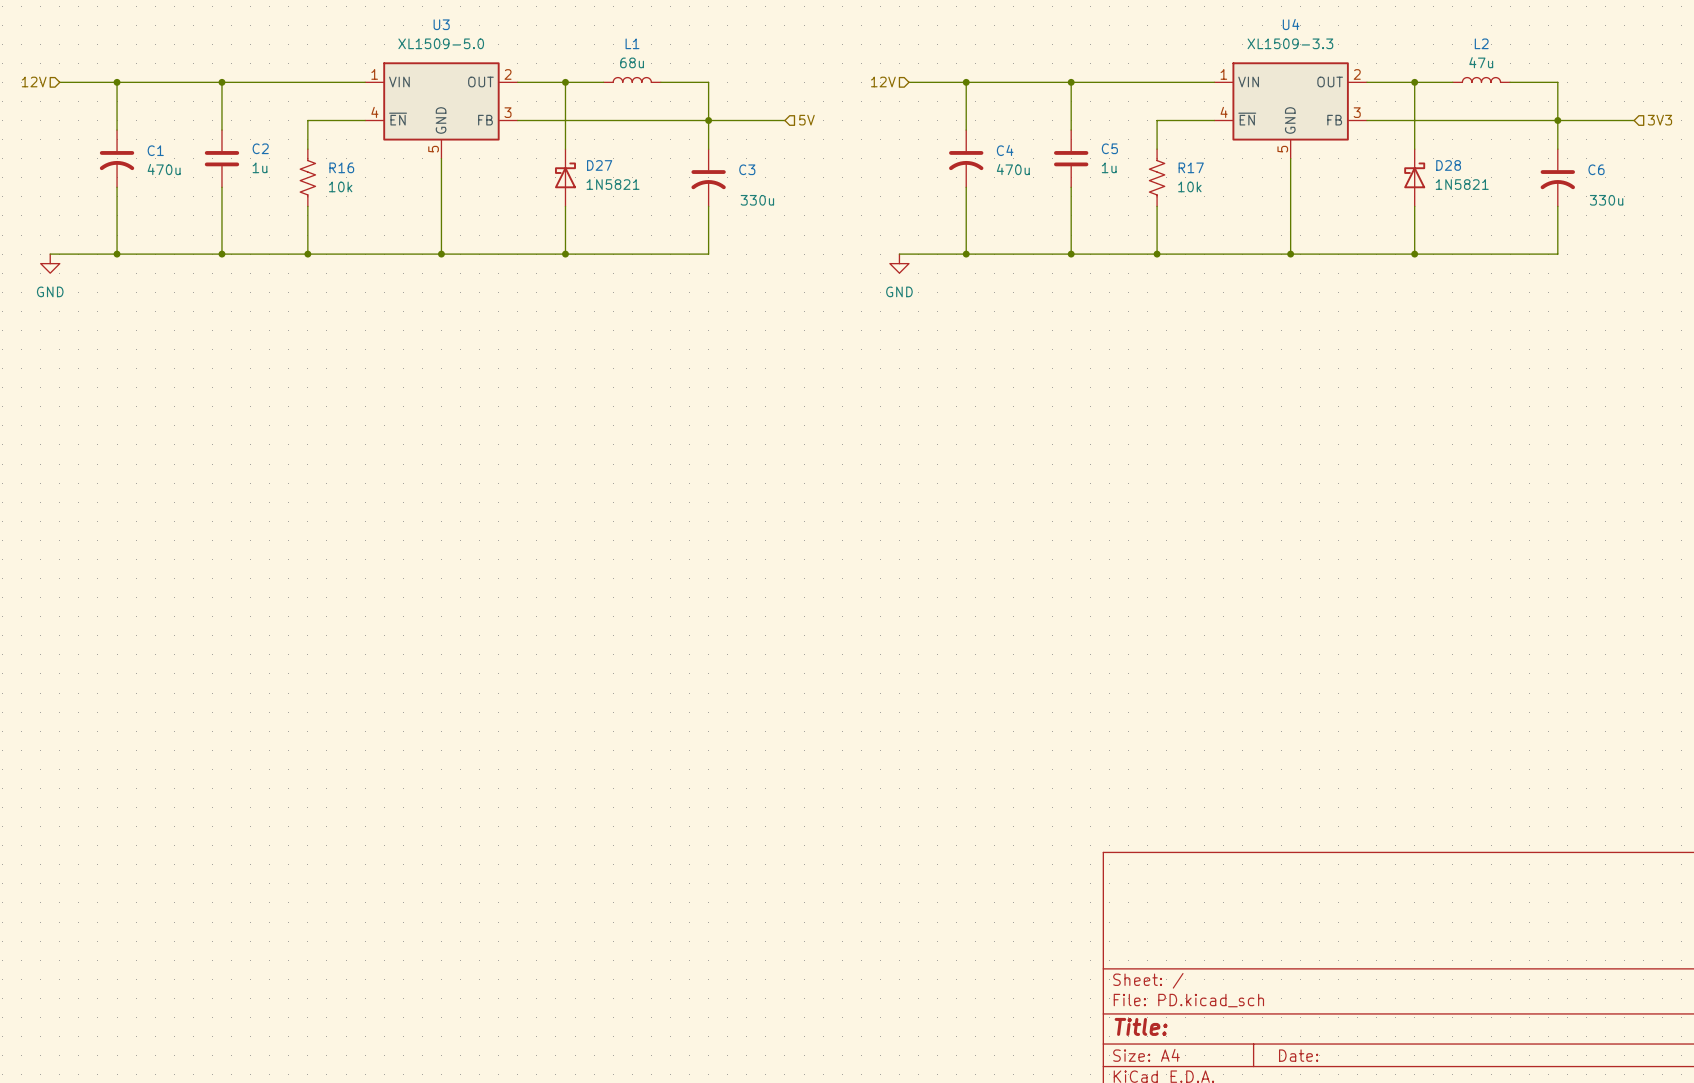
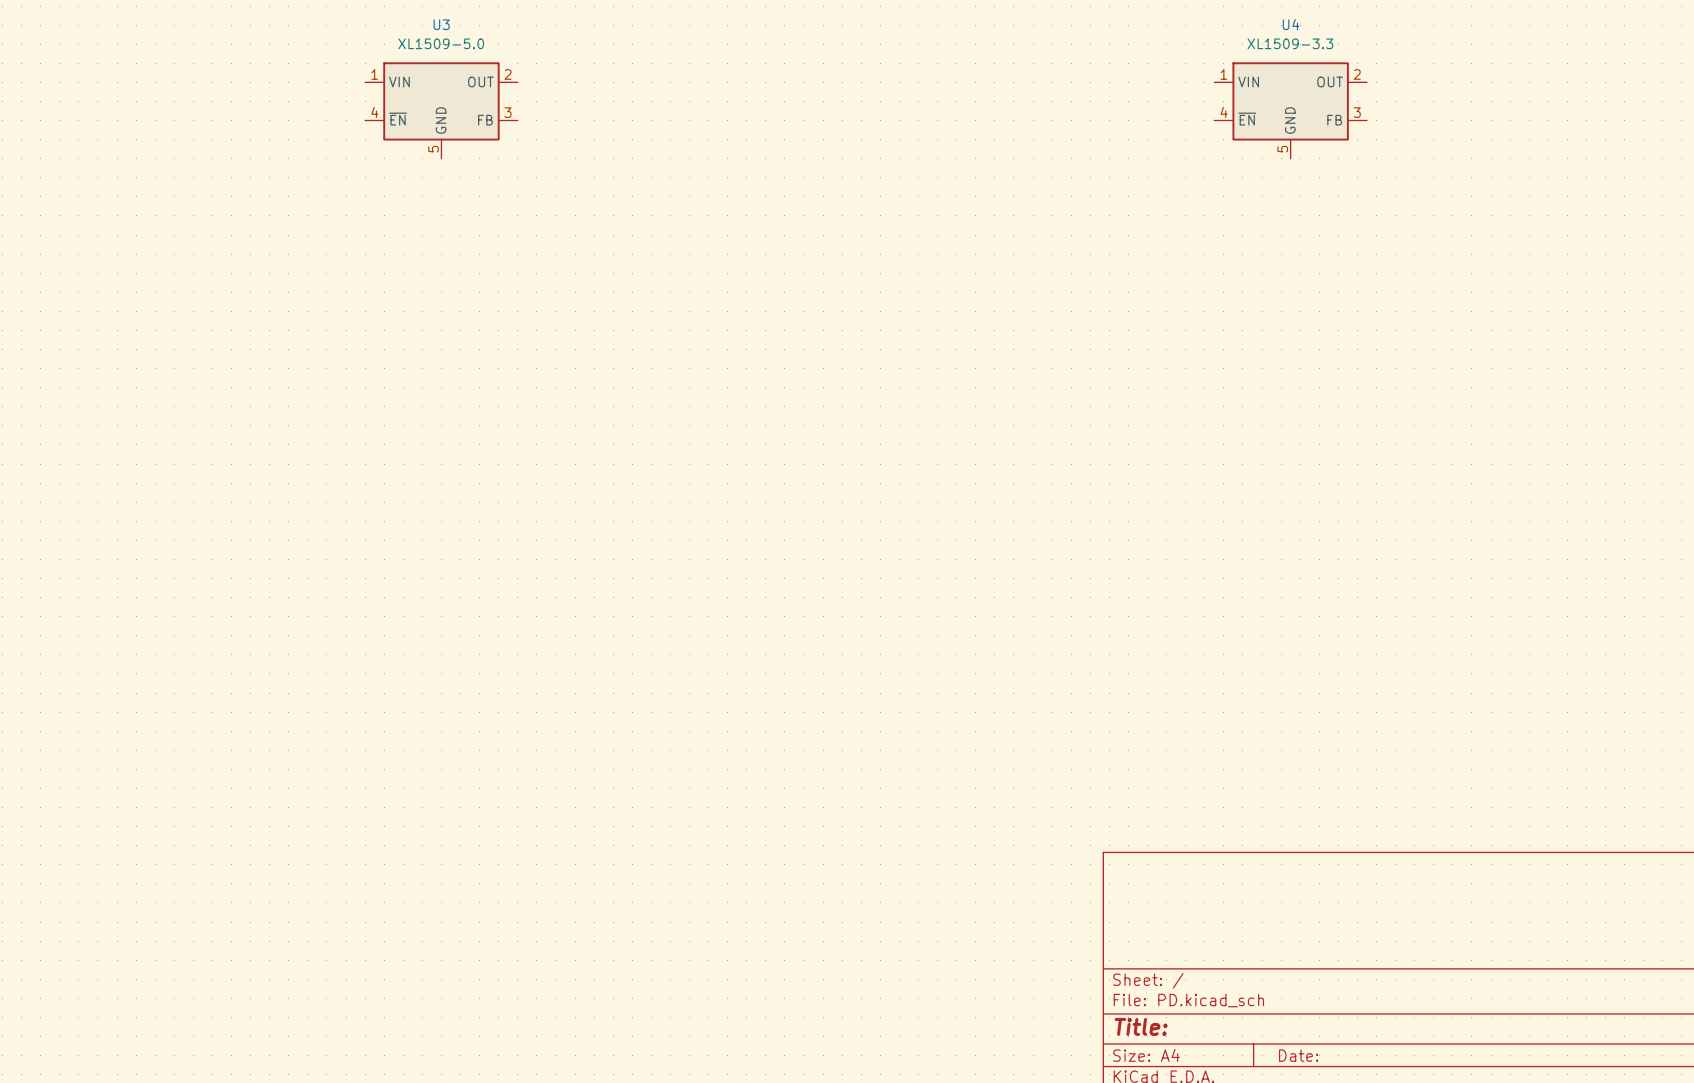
L1: 68u (632, 79) -> none
L2: 47u (1481, 79) -> none
hierarchical label: 12V (34, 81) -> none
hierarchical label: 12V (883, 81) -> none
wire: (59, 82) (365, 82) -> none
wire: (117, 82) (117, 130) -> none
junction: (117, 82) -> none
wire: (221, 82) (221, 130) -> none
junction: (221, 82) -> none
wire: (517, 82) (603, 82) -> none
wire: (565, 82) (565, 149) -> none
junction: (565, 82) -> none
wire: (660, 82) (708, 82) (708, 149) -> none
wire: (908, 82) (1214, 82) -> none
wire: (966, 82) (966, 130) -> none
junction: (966, 82) -> none
wire: (1071, 82) (1071, 130) -> none
junction: (1071, 82) -> none
wire: (1366, 82) (1452, 82) -> none
wire: (1414, 82) (1414, 149) -> none
junction: (1414, 82) -> none
wire: (1510, 82) (1557, 82) (1557, 149) -> none
wire: (365, 120) (307, 120) (307, 149) -> none
wire: (517, 120) (784, 120) -> none
junction: (708, 120) -> none
hierarchical label: 5V (806, 120) -> none
wire: (1214, 120) (1157, 120) (1157, 149) -> none
wire: (1366, 120) (1634, 120) -> none
junction: (1557, 120) -> none
hierarchical label: 3V3 (1659, 120) -> none
C1: 470u (117, 158) -> none
C2: 1u (221, 158) -> none
wire: (441, 158) (441, 254) -> none
C4: 470u (966, 158) -> none
C5: 1u (1071, 158) -> none
wire: (1290, 158) (1290, 254) -> none
R16: 10k (307, 177) -> none
D27: 1N5821 (565, 177) -> none
C3: 330u (708, 177) -> none
R17: 10k (1157, 177) -> none
D28: 1N5821 (1414, 177) -> none
C6: 330u (1557, 177) -> none
wire: (117, 187) (117, 254) -> none
wire: (221, 187) (221, 254) -> none
wire: (966, 187) (966, 254) -> none
wire: (1071, 187) (1071, 254) -> none
wire: (307, 206) (307, 254) -> none
wire: (565, 206) (565, 254) -> none
wire: (708, 206) (708, 254) (50, 254) -> none
wire: (1157, 206) (1157, 254) -> none
wire: (1414, 206) (1414, 254) -> none
wire: (1557, 206) (1557, 254) (899, 254) -> none
junction: (117, 254) -> none
junction: (221, 254) -> none
junction: (307, 254) -> none
junction: (441, 254) -> none
junction: (565, 254) -> none
junction: (966, 254) -> none
junction: (1071, 254) -> none
junction: (1157, 254) -> none
junction: (1290, 254) -> none
junction: (1414, 254) -> none
power symbol: GND (50, 263) -> none
power symbol: GND (899, 263) -> none

